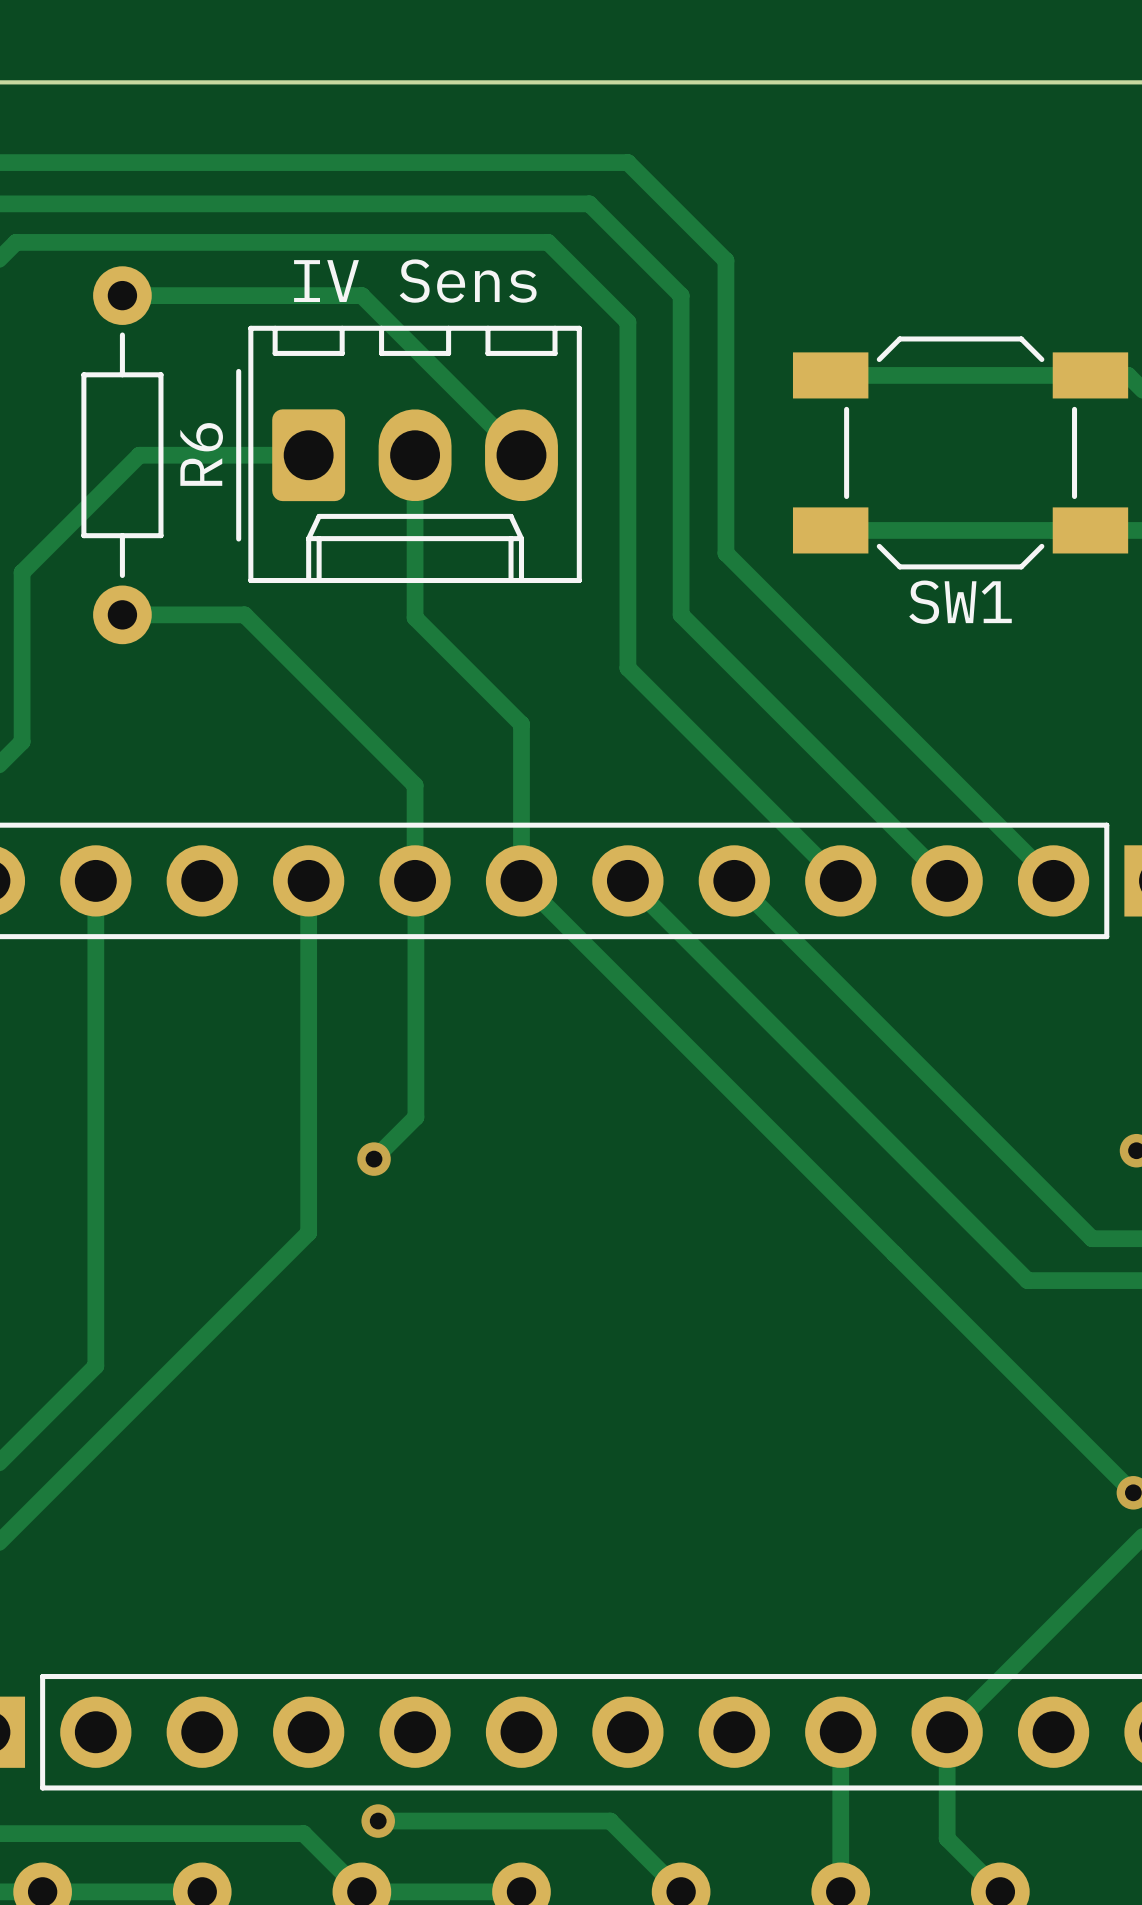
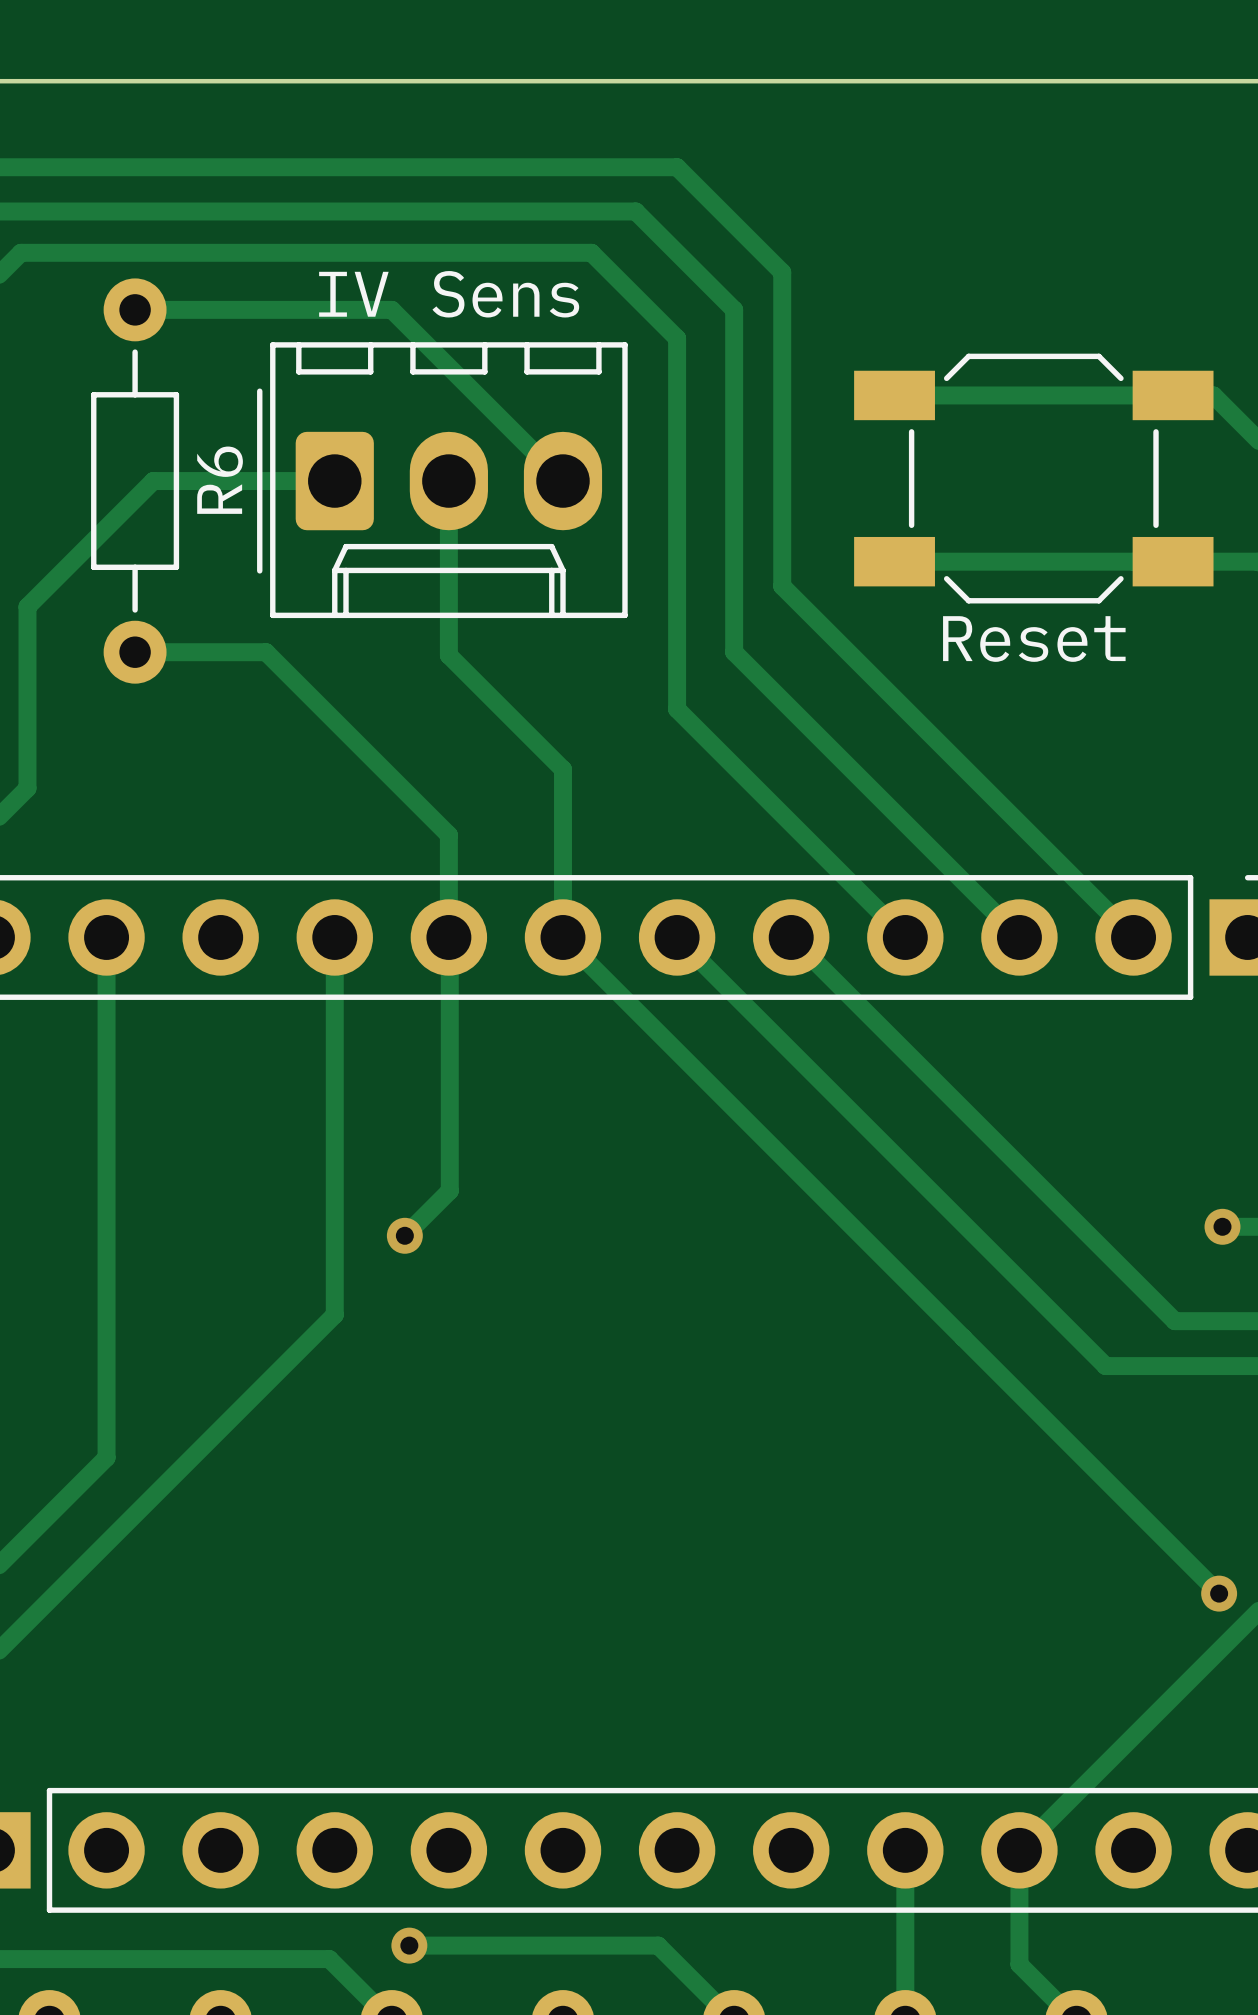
SW1 name: SW1 (960, 602) -> Reset (1034, 639)

